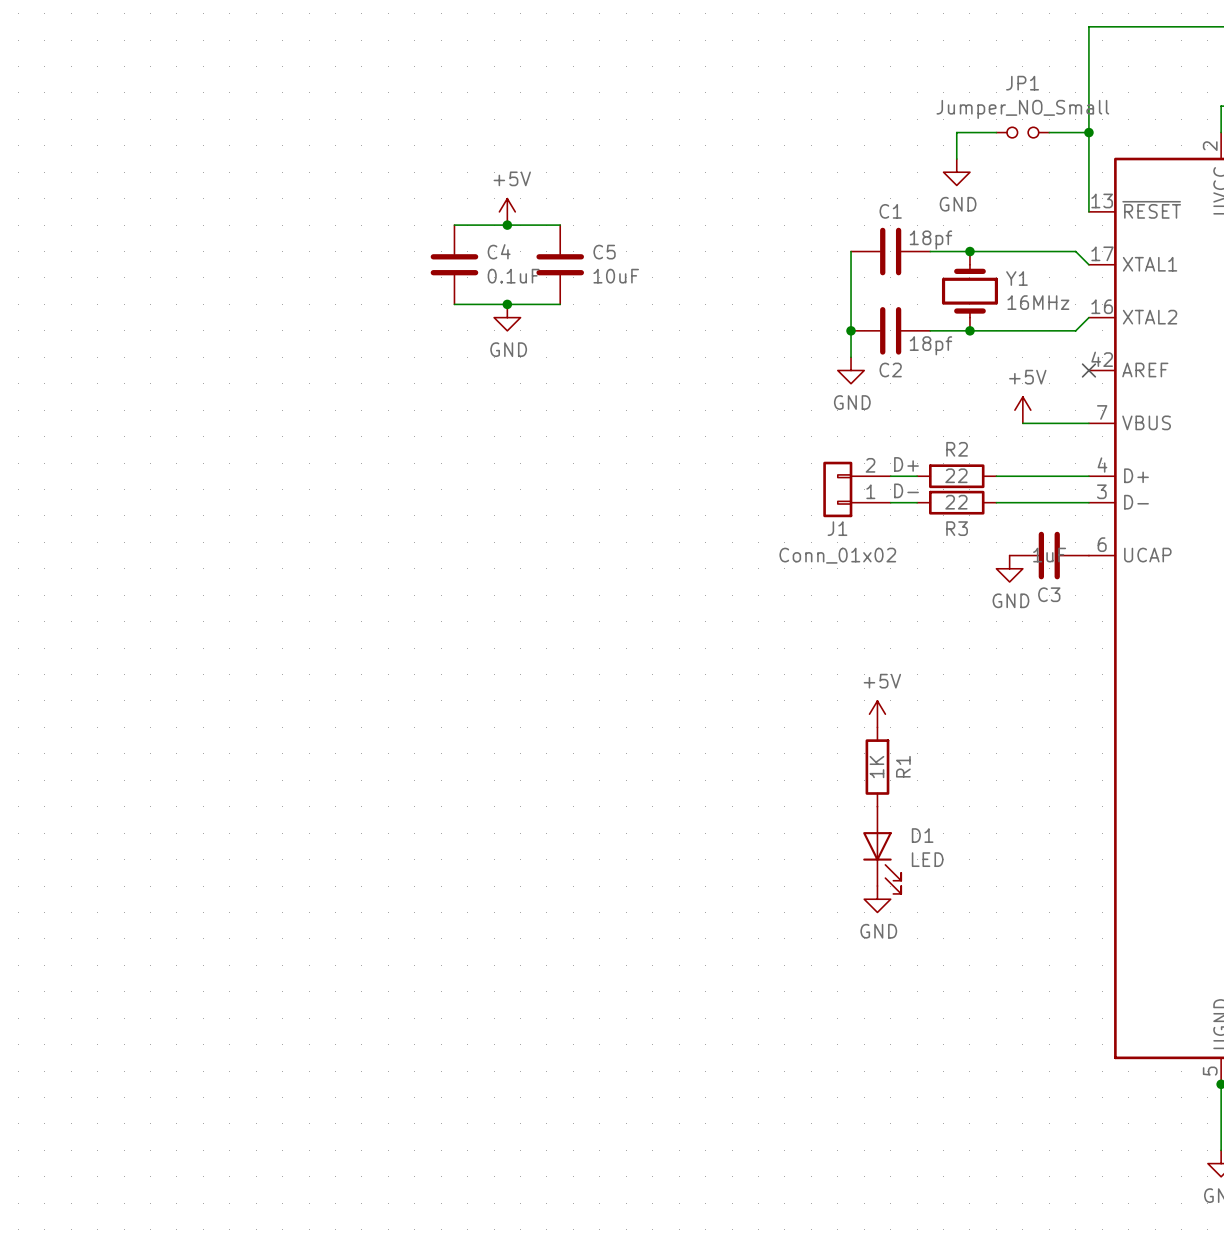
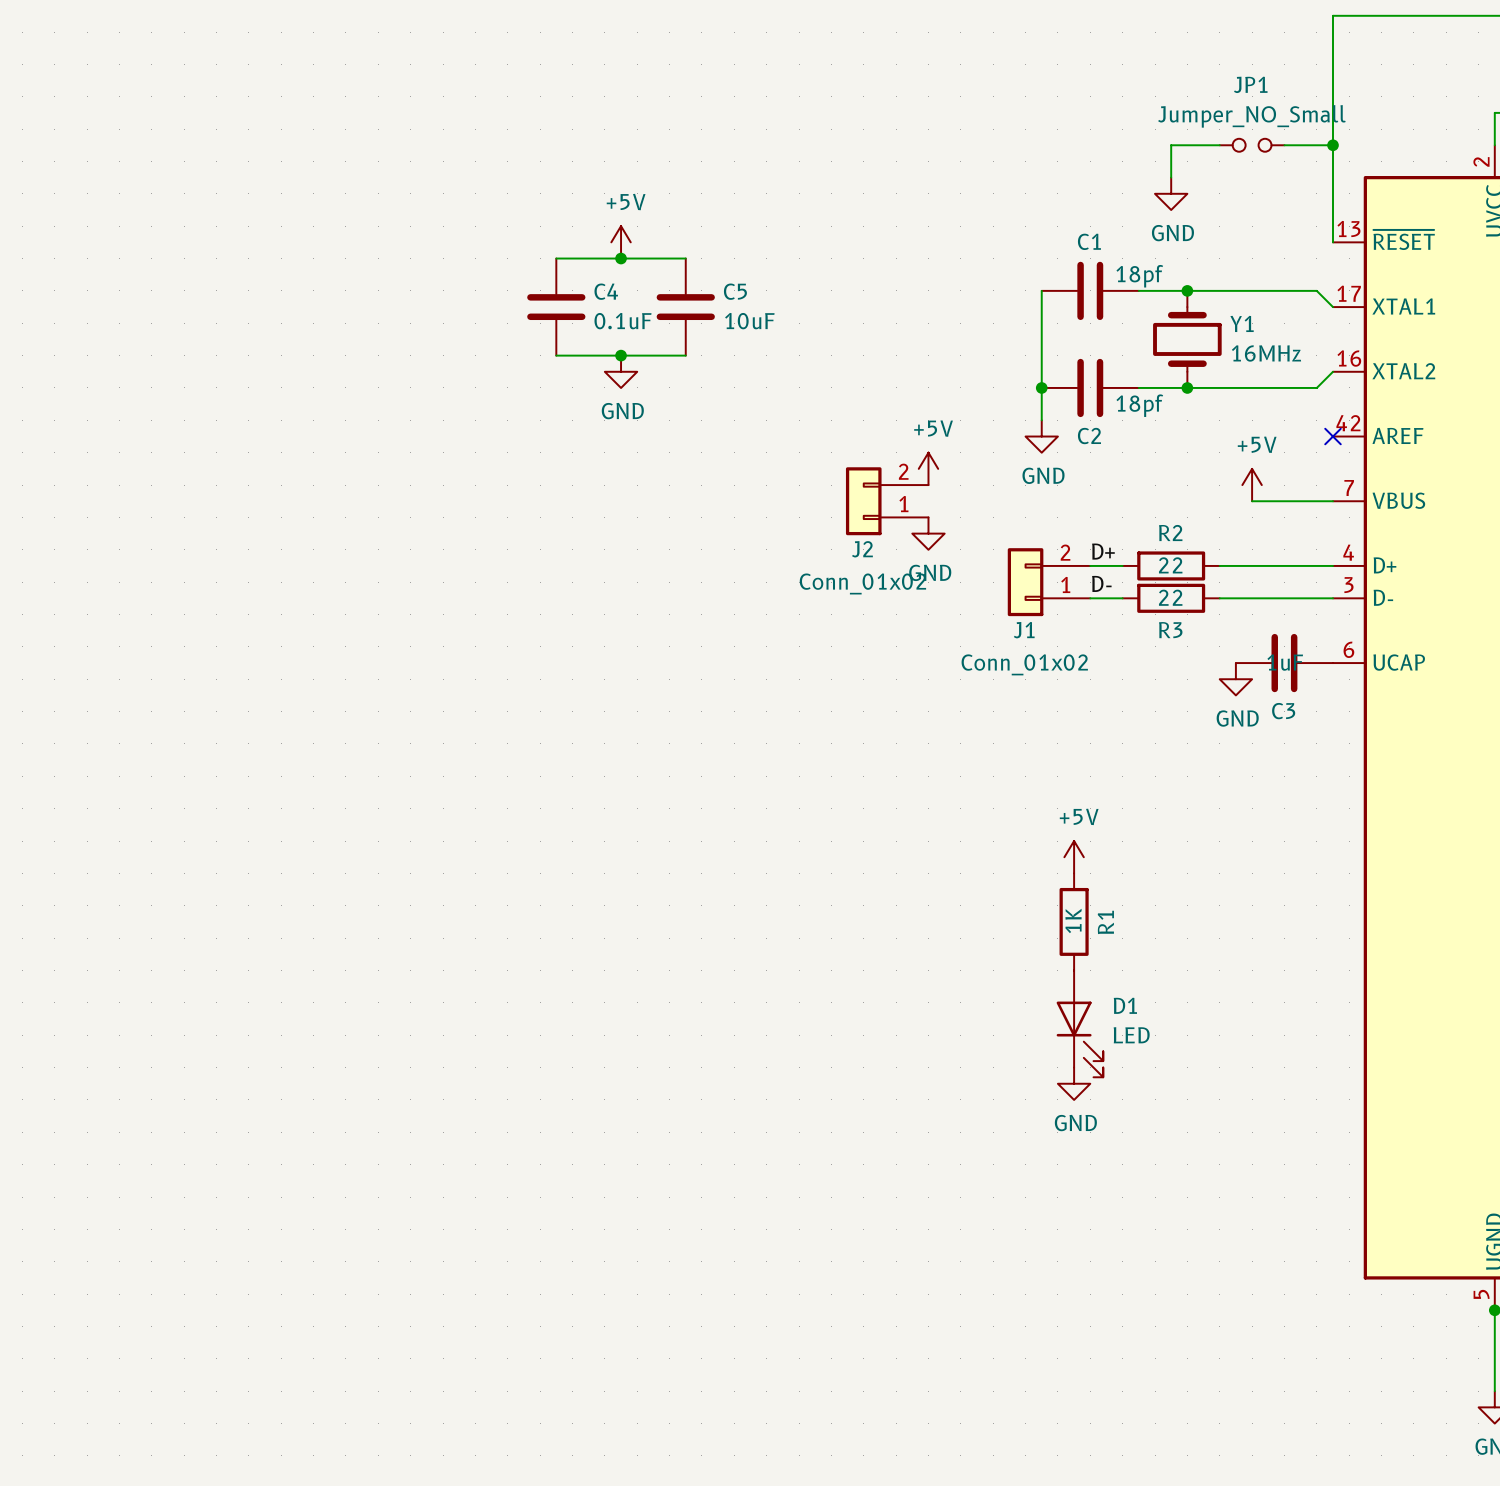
power symbol: none -> +5V (928, 468)
J2: none -> Conn_01x02 (887, 501)
power symbol: none -> GND (928, 533)

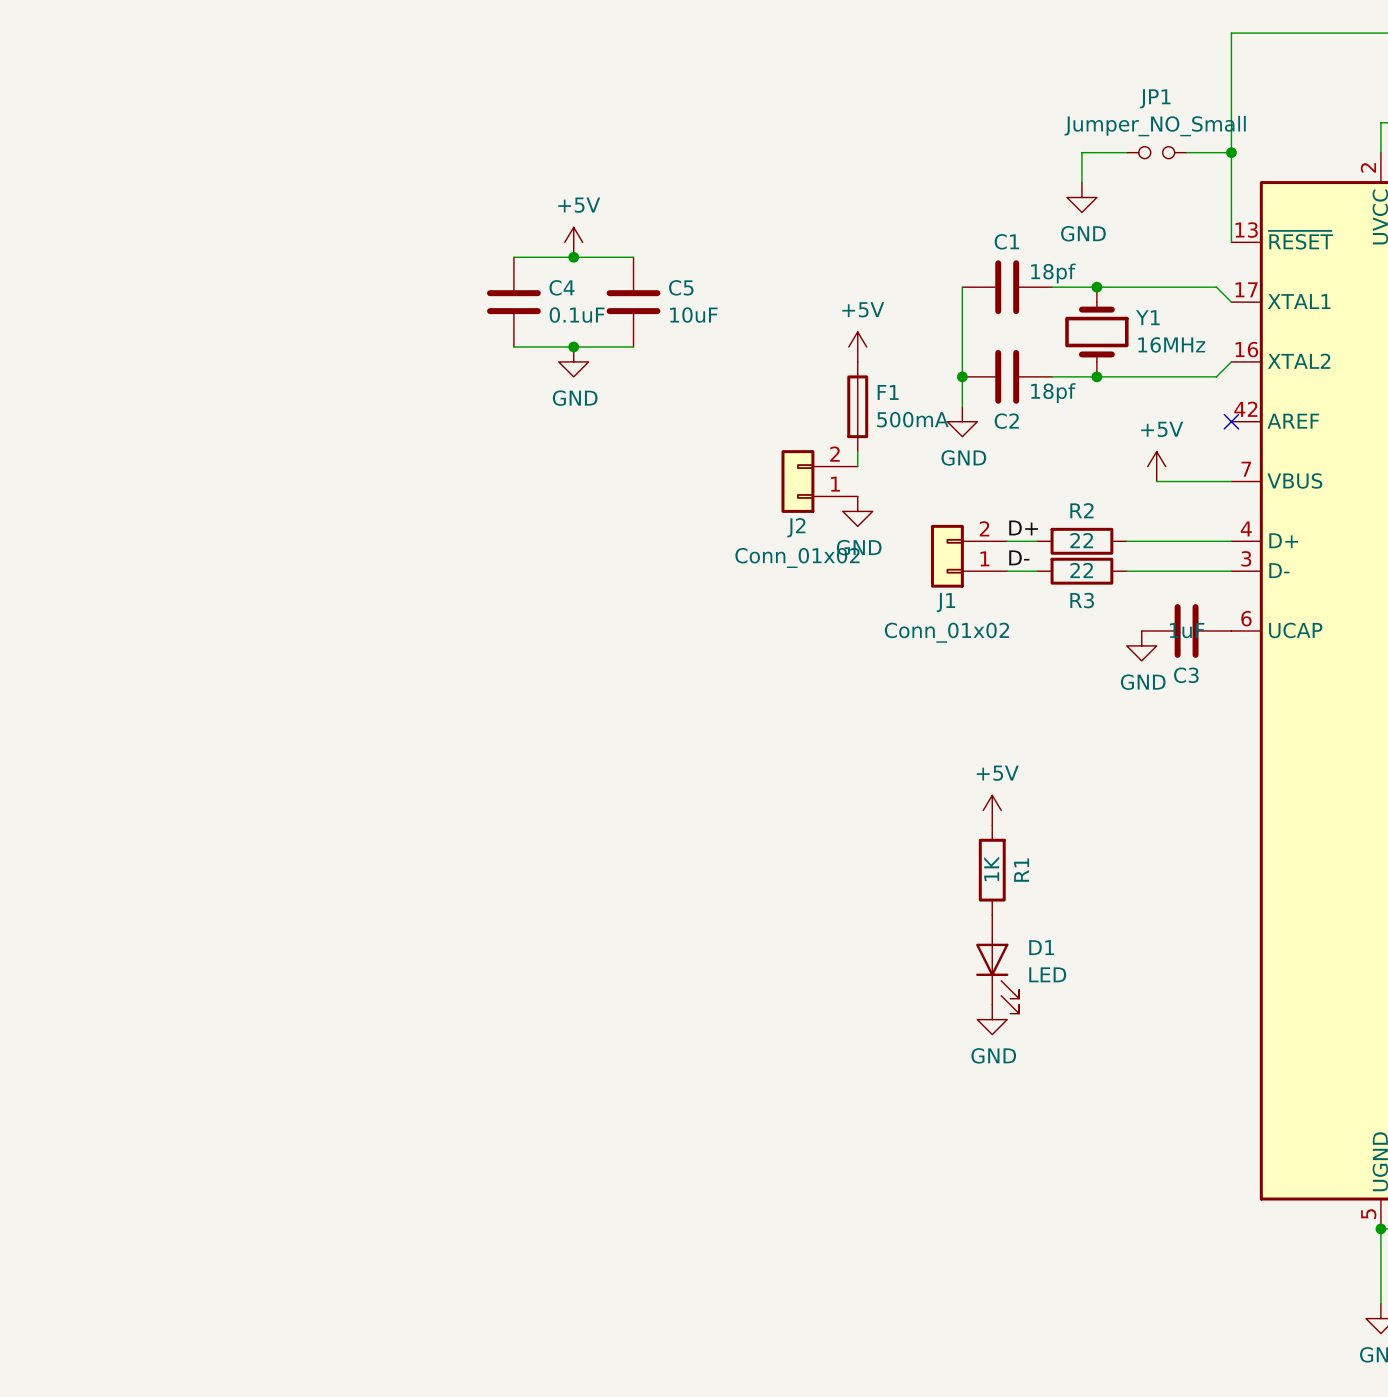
F1: none -> 500mA (857, 406)
power symbol position: +5V (928, 468) -> +5V (857, 346)

